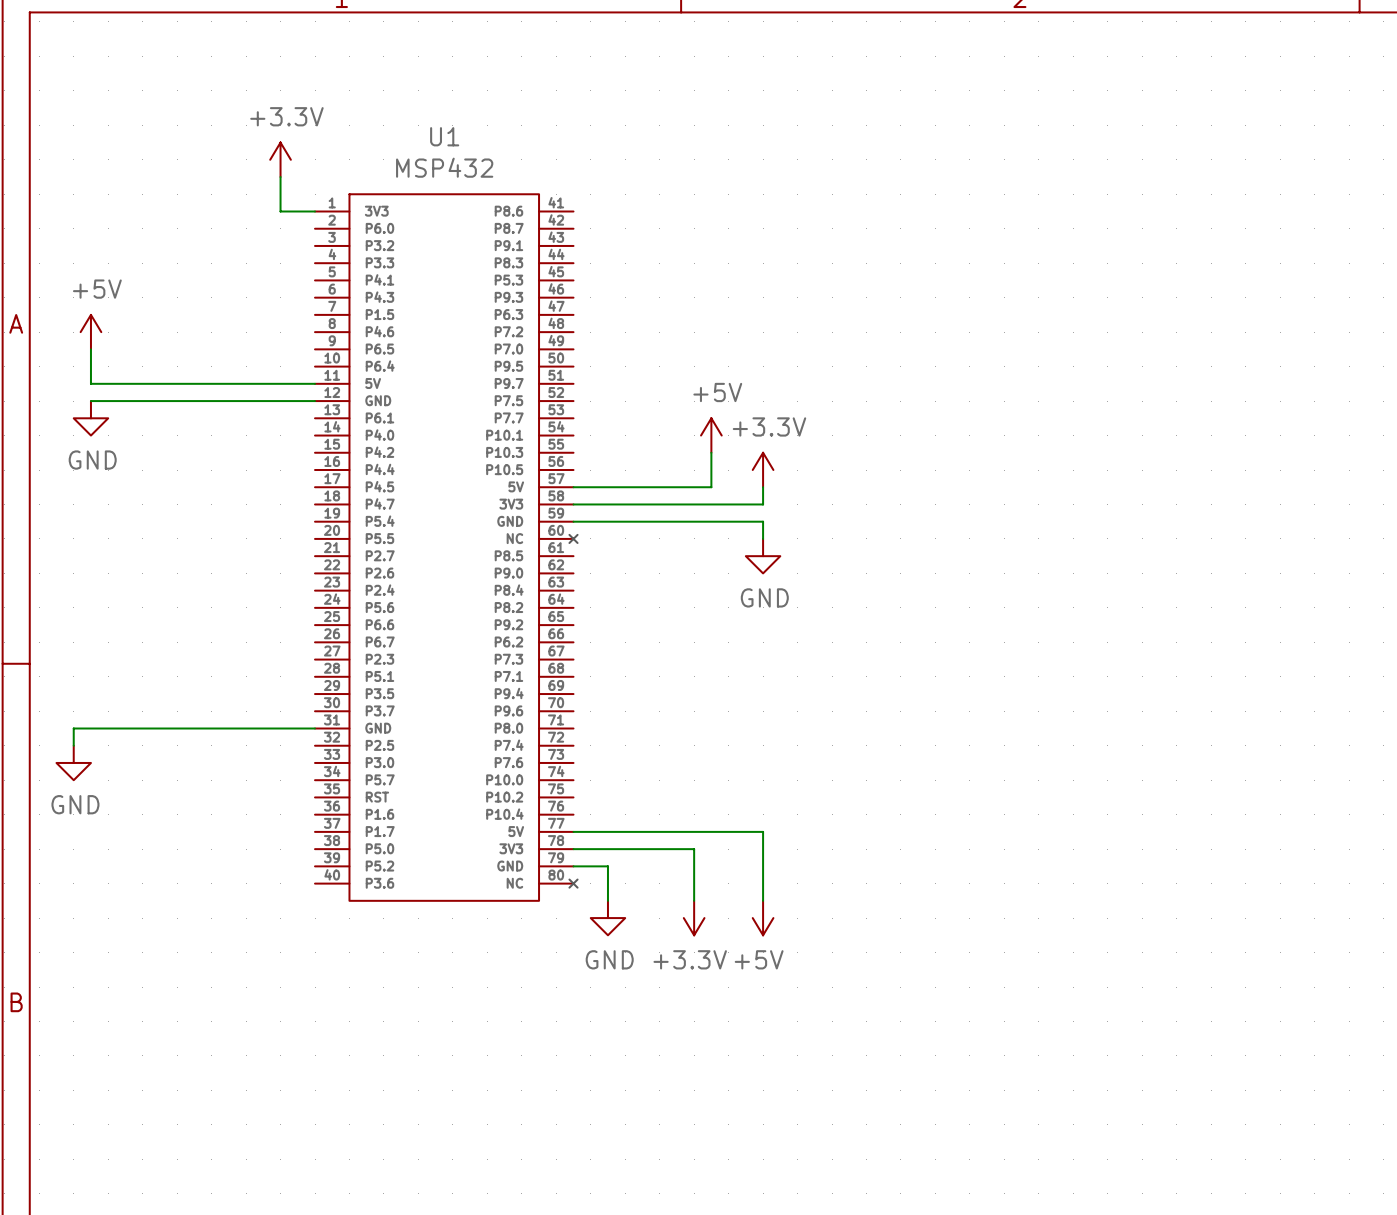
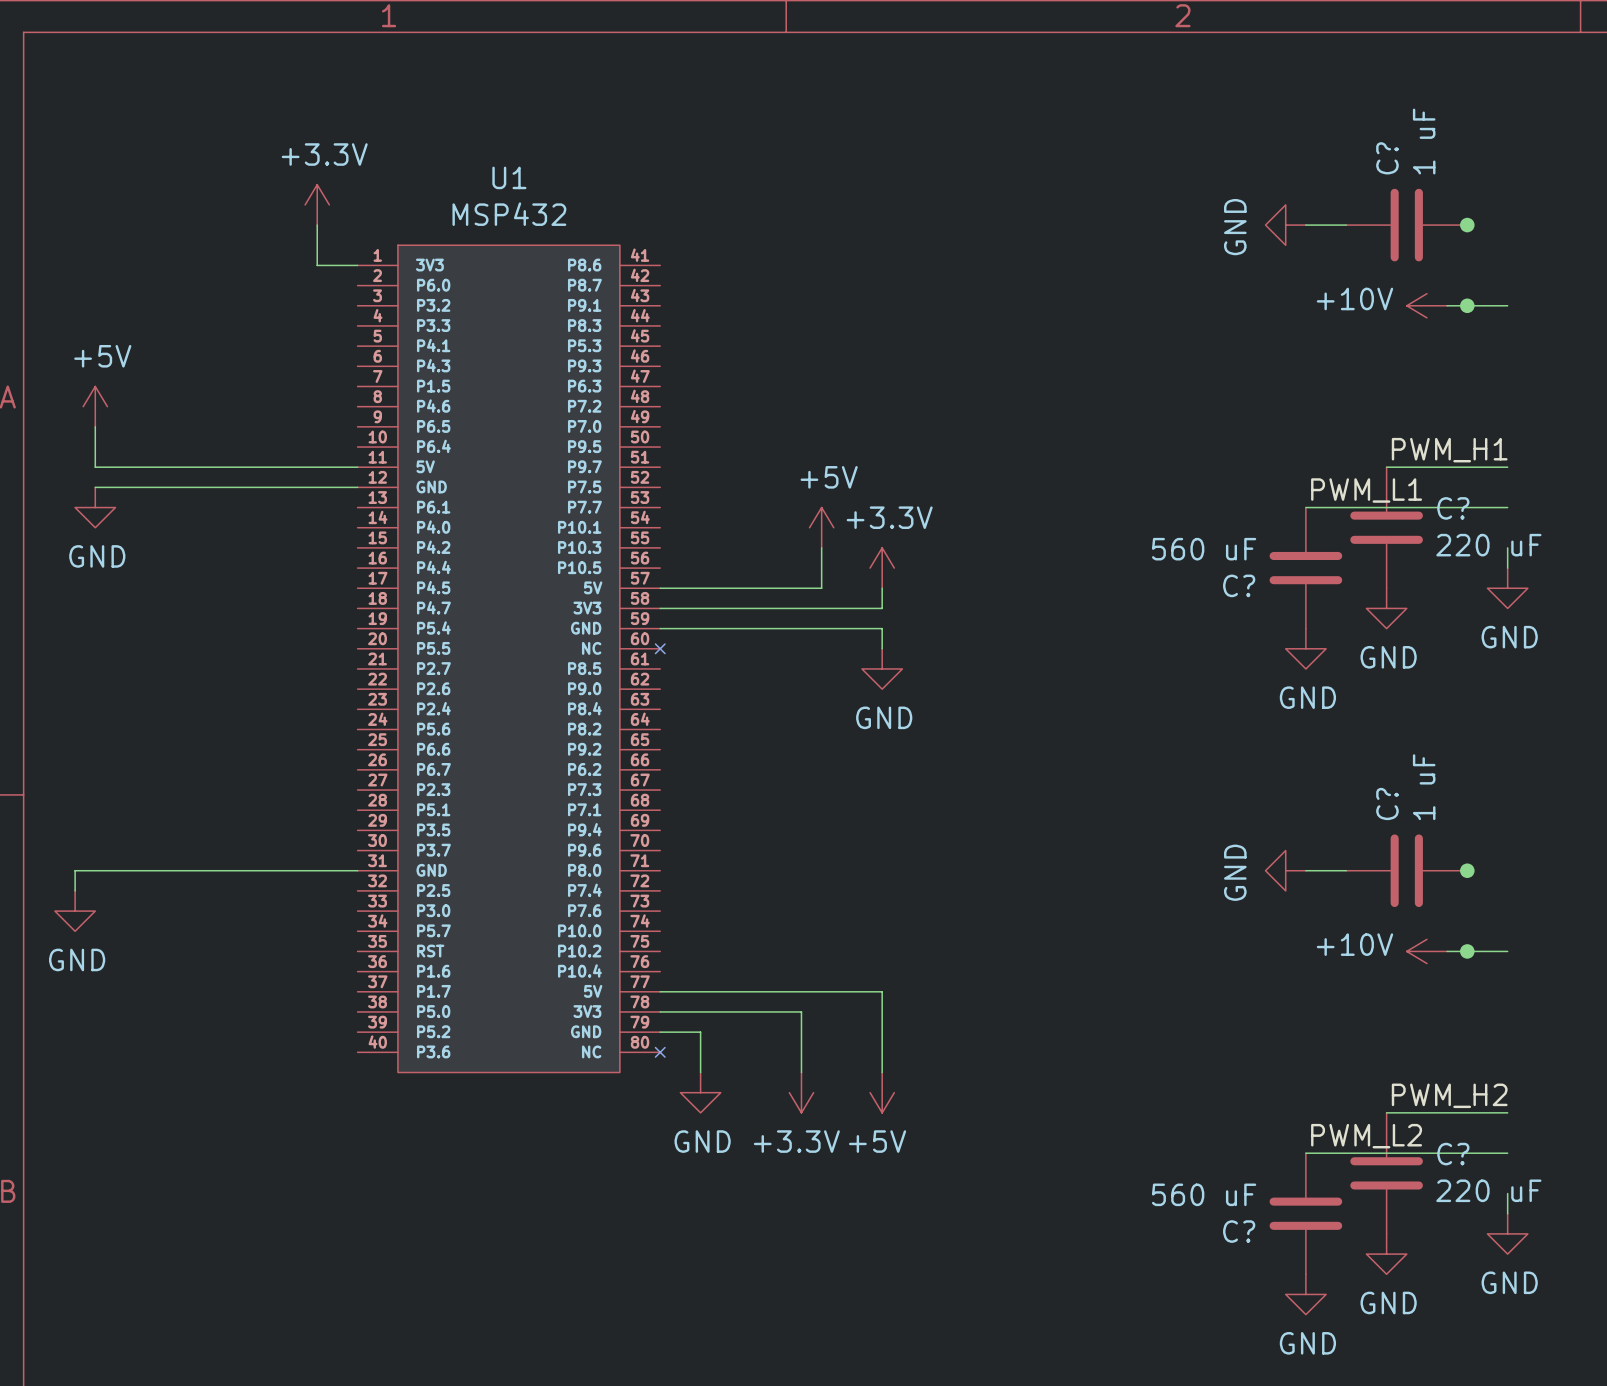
power symbol: none -> GND (1285, 225)
wire: none -> (1305, 225) (1346, 225)
C?: none -> 1 uF (1406, 225)
junction: none -> (1467, 225)
power symbol: none -> +10V (1426, 305)
wire: none -> (1447, 305) (1507, 305)
junction: none -> (1467, 305)
label: none -> PWM_H1 (1449, 450)
wire: none -> (1386, 467) (1507, 467)
label: none -> PWM_L1 (1366, 490)
wire: none -> (1305, 507) (1507, 507)
C?: none -> 220 uF (1386, 527)
wire: none -> (1507, 547) (1507, 568)
C?: none -> 560 uF (1305, 568)
power symbol: none -> GND (1507, 588)
power symbol: none -> GND (1386, 608)
power symbol: none -> GND (1305, 648)
power symbol: none -> GND (1285, 870)
wire: none -> (1305, 870) (1346, 870)
C?: none -> 1 uF (1406, 870)
junction: none -> (1467, 870)
power symbol: none -> +10V (1426, 951)
wire: none -> (1447, 951) (1507, 951)
junction: none -> (1467, 951)
label: none -> PWM_H2 (1449, 1095)
wire: none -> (1386, 1112) (1507, 1112)
label: none -> PWM_L2 (1366, 1136)
wire: none -> (1305, 1153) (1507, 1153)
C?: none -> 220 uF (1386, 1173)
wire: none -> (1507, 1193) (1507, 1213)
C?: none -> 560 uF (1305, 1213)
power symbol: none -> GND (1507, 1233)
power symbol: none -> GND (1386, 1254)
power symbol: none -> GND (1305, 1294)

